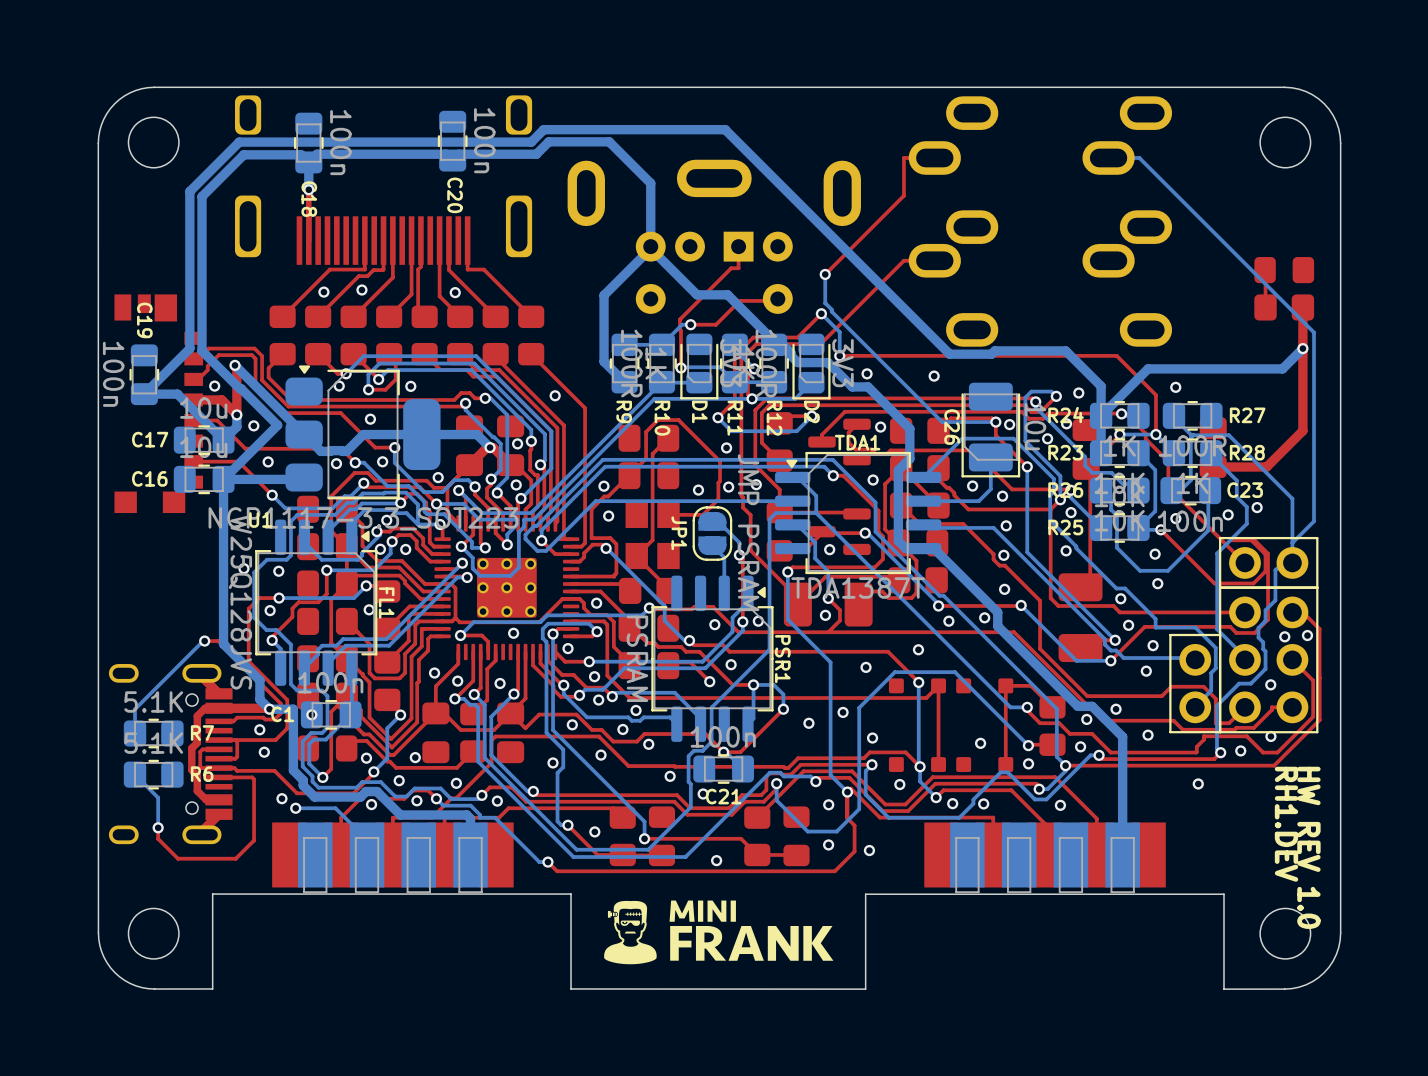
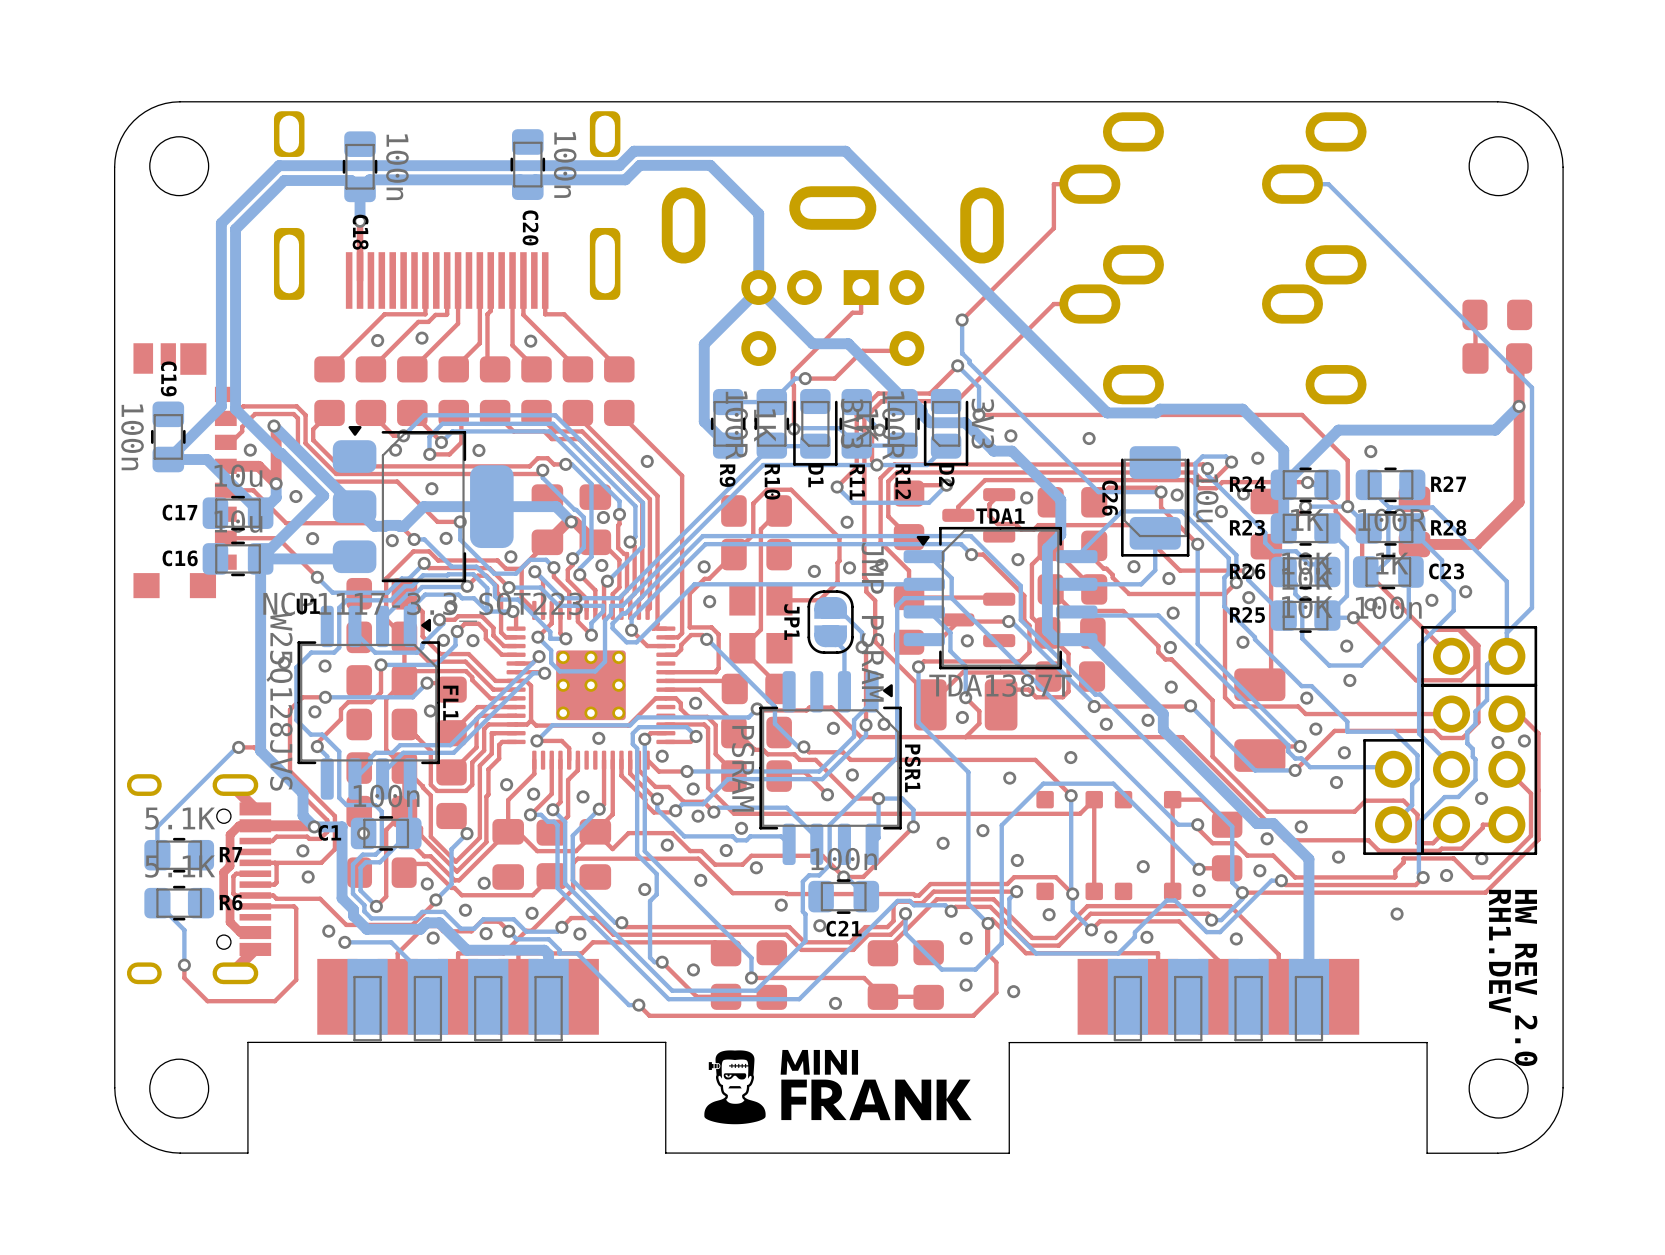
text: HW REV 1.0 (1308, 847) -> HW REV 2.0 (1526, 977)

